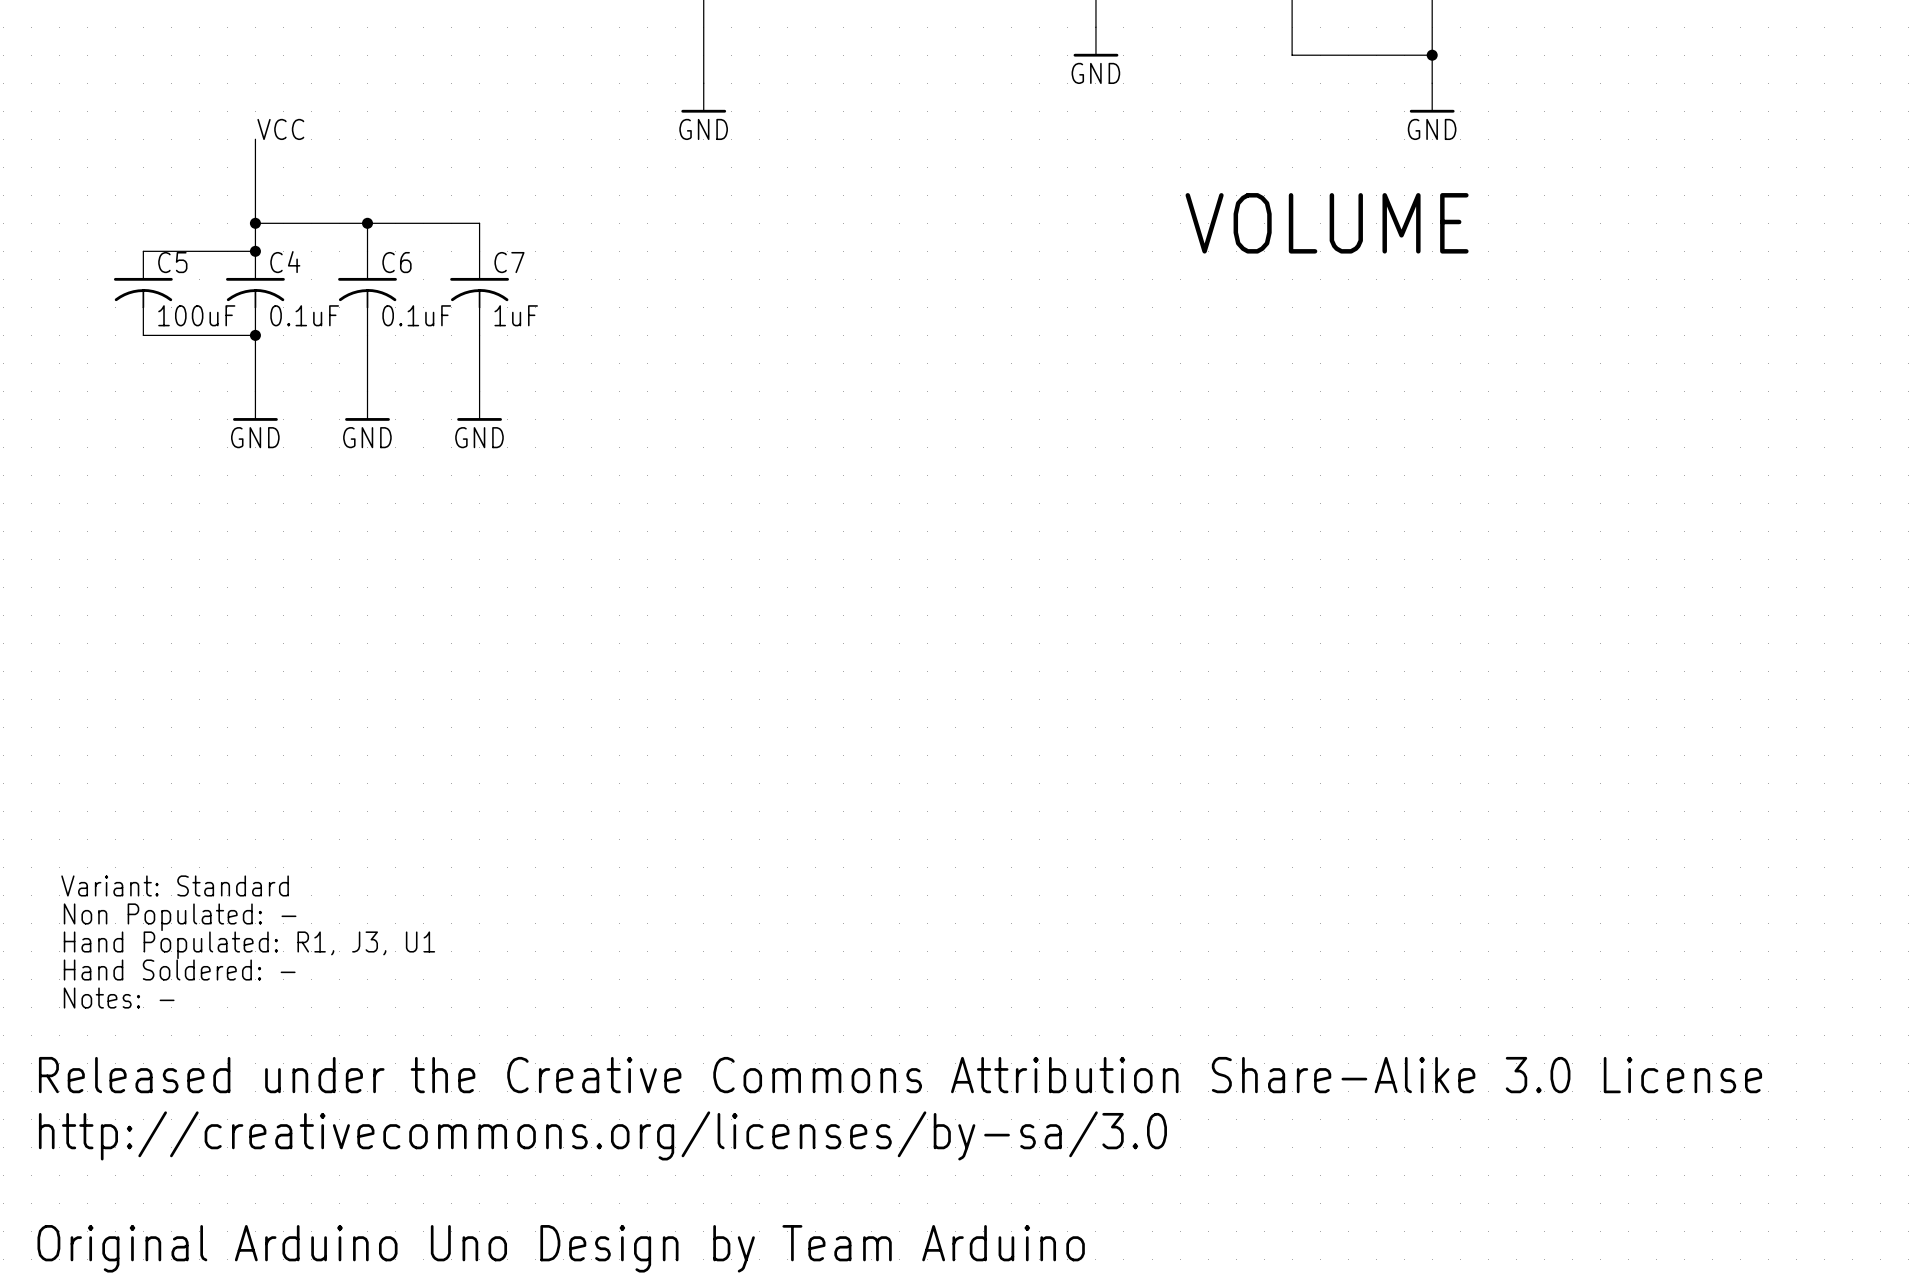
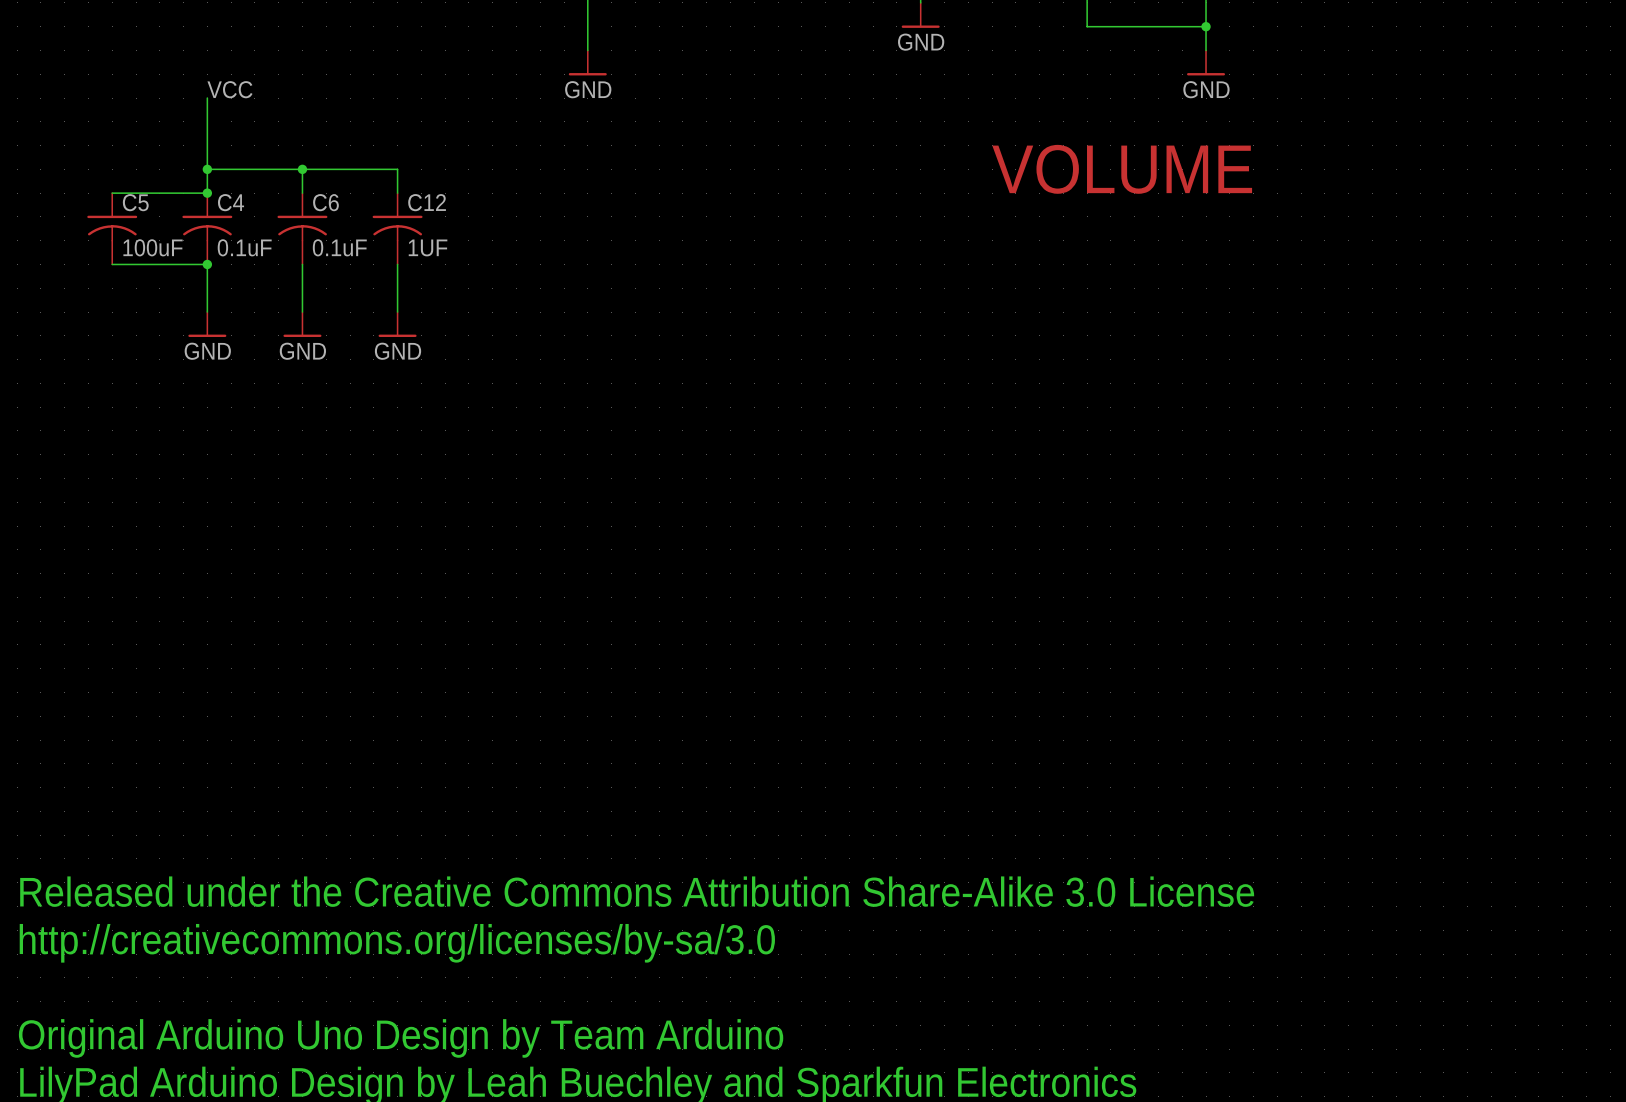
C7 name: C7 (509, 262) -> C12 (427, 202)
C7 value: 1uF (516, 315) -> 1UF (428, 247)
text: Variant: Standard (175, 885) -> none
text: Non Populated: - (180, 917) -> none
text: Hand Populated: R1, J3, U1 (249, 945) -> none
text: Hand Soldered: - (179, 970) -> none
text: Notes: - (119, 998) -> none

